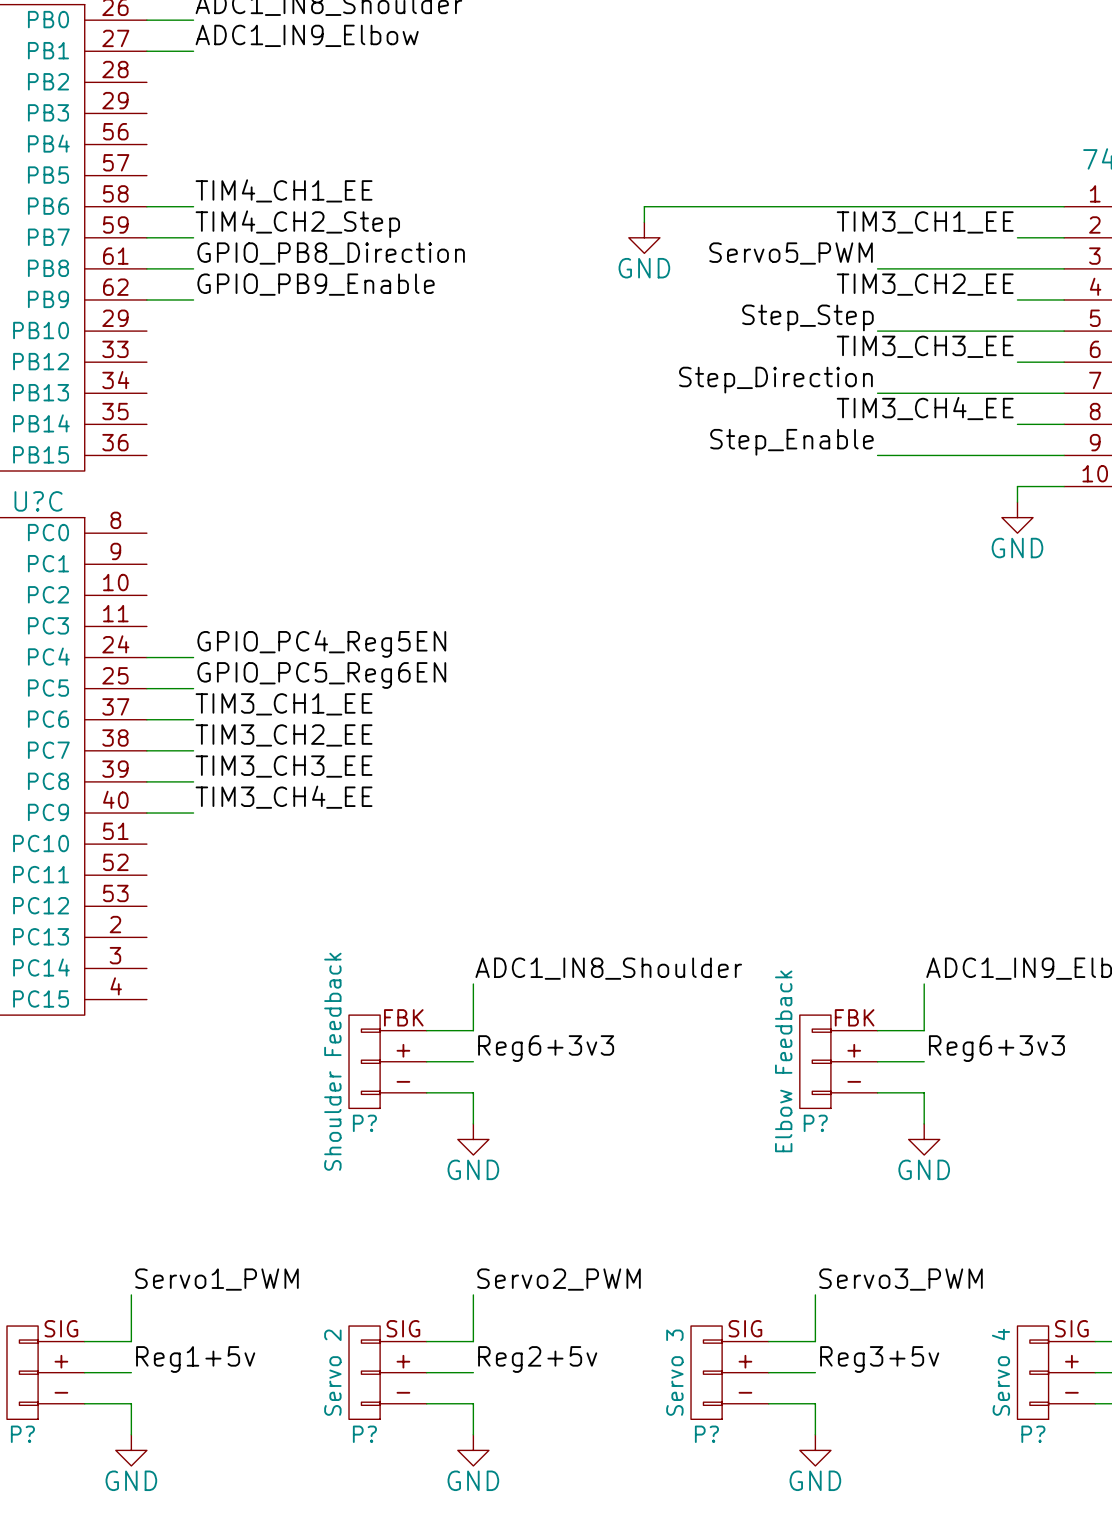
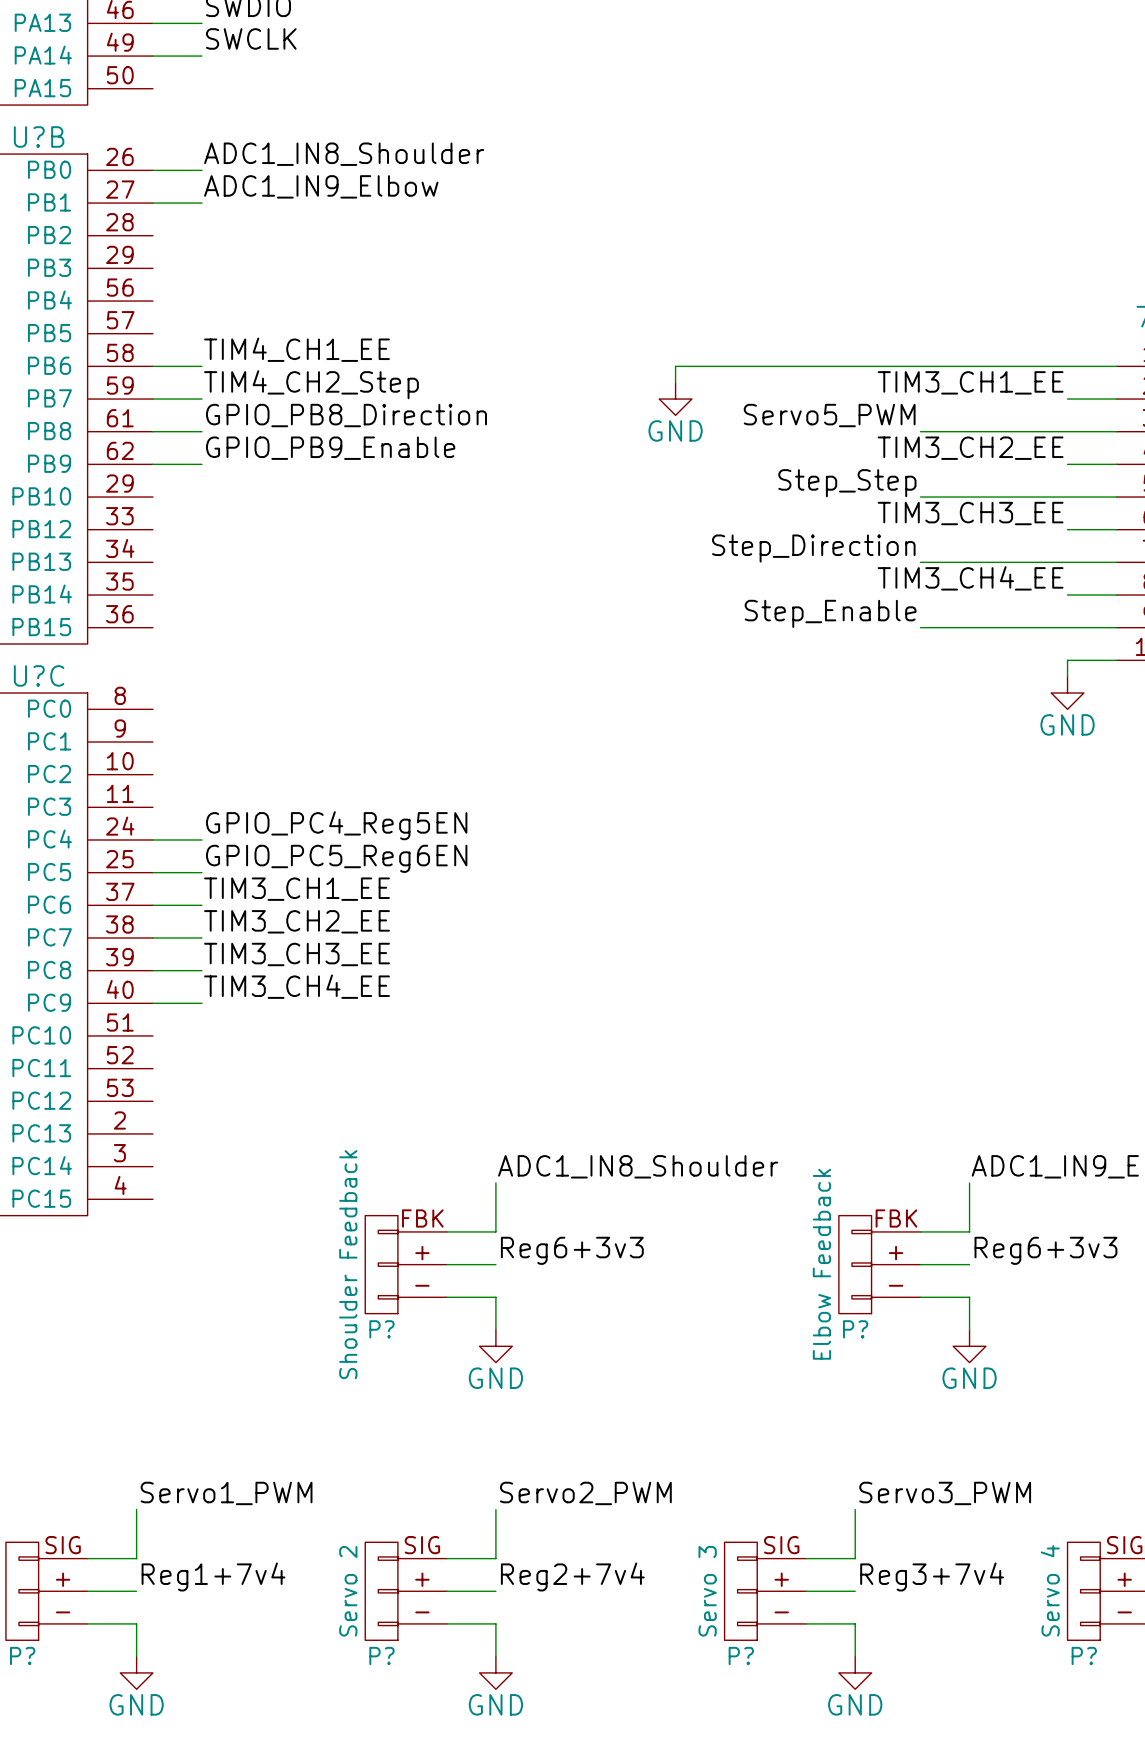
label: Reg1+5v (195, 1359) -> Reg1+7v4 (213, 1576)
label: Reg2+5v (537, 1359) -> Reg2+7v4 (572, 1576)
label: Reg3+5v (879, 1359) -> Reg3+7v4 (932, 1576)

